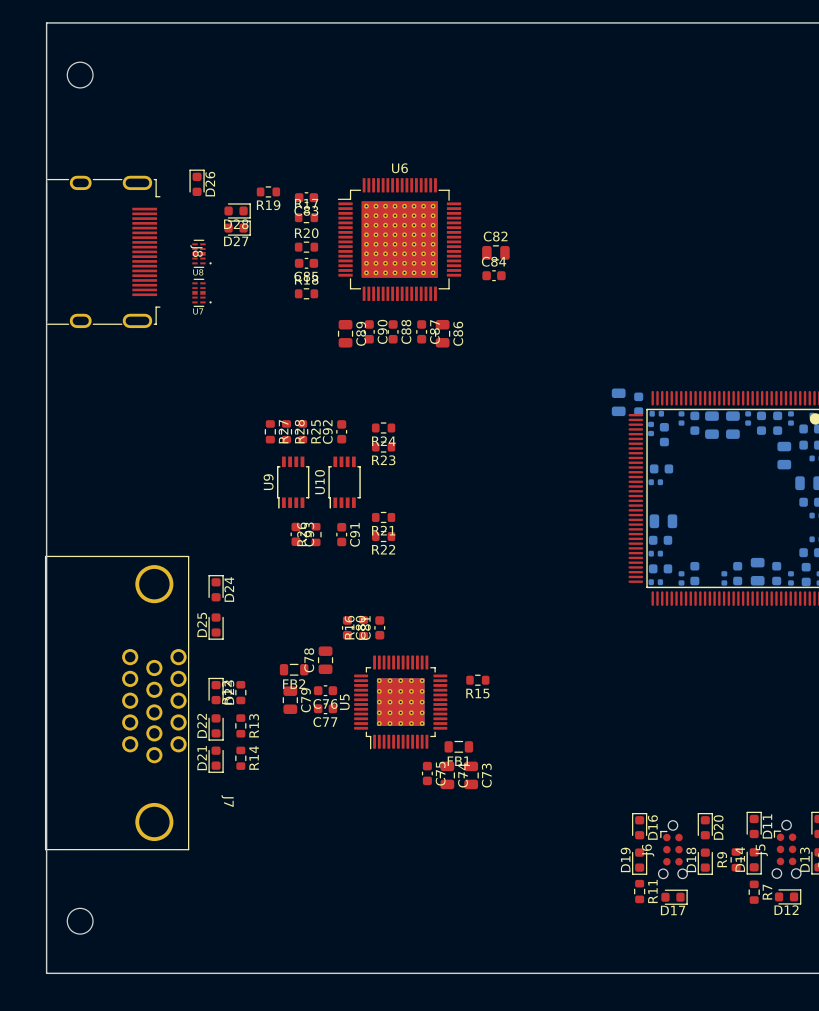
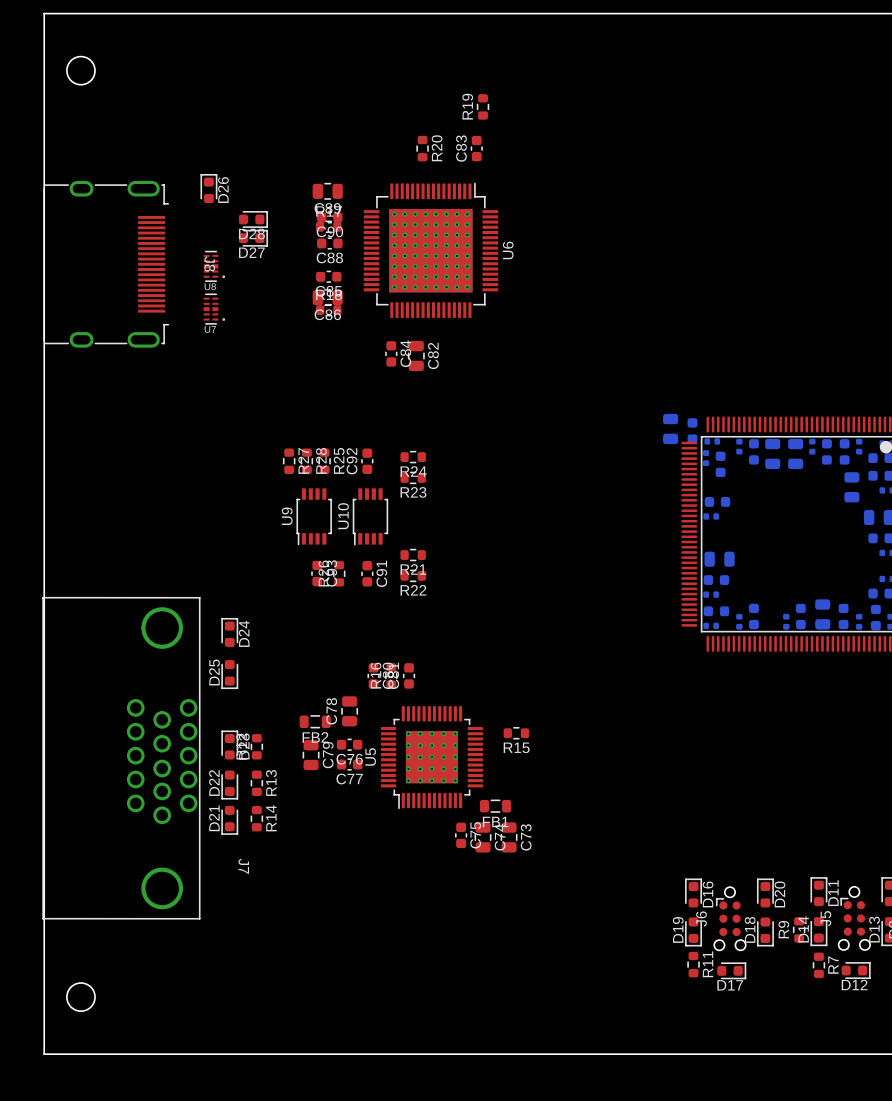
R19 rotation: 0° (268, 191) -> 90° clockwise (483, 106)
R19 position: (268, 191) -> (483, 106)
C83 rotation: 0° (306, 197) -> 90° clockwise (476, 148)
C83 position: (306, 197) -> (476, 148)
U6 rotation: 0° (399, 239) -> 90° clockwise (430, 250)
R20 rotation: 0° (306, 247) -> 90° clockwise (422, 148)
R20 position: (306, 247) -> (422, 148)
C82 rotation: 0° (495, 252) -> 90° clockwise (416, 355)
C82 position: (495, 252) -> (416, 355)
C84 rotation: 0° (494, 275) -> 90° clockwise (391, 353)
C84 position: (494, 275) -> (391, 353)
C90 rotation: 0° (369, 331) -> 90° clockwise (329, 217)
C90 position: (369, 331) -> (329, 217)
C88 rotation: 0° (393, 331) -> 90° clockwise (329, 243)
C88 position: (393, 331) -> (329, 243)
C87: (421, 331) -> none
C89 rotation: 0° (345, 333) -> 90° clockwise (327, 191)
C89 position: (345, 333) -> (327, 191)
C86 rotation: 0° (442, 333) -> 90° clockwise (327, 297)
C86 position: (442, 333) -> (327, 297)

